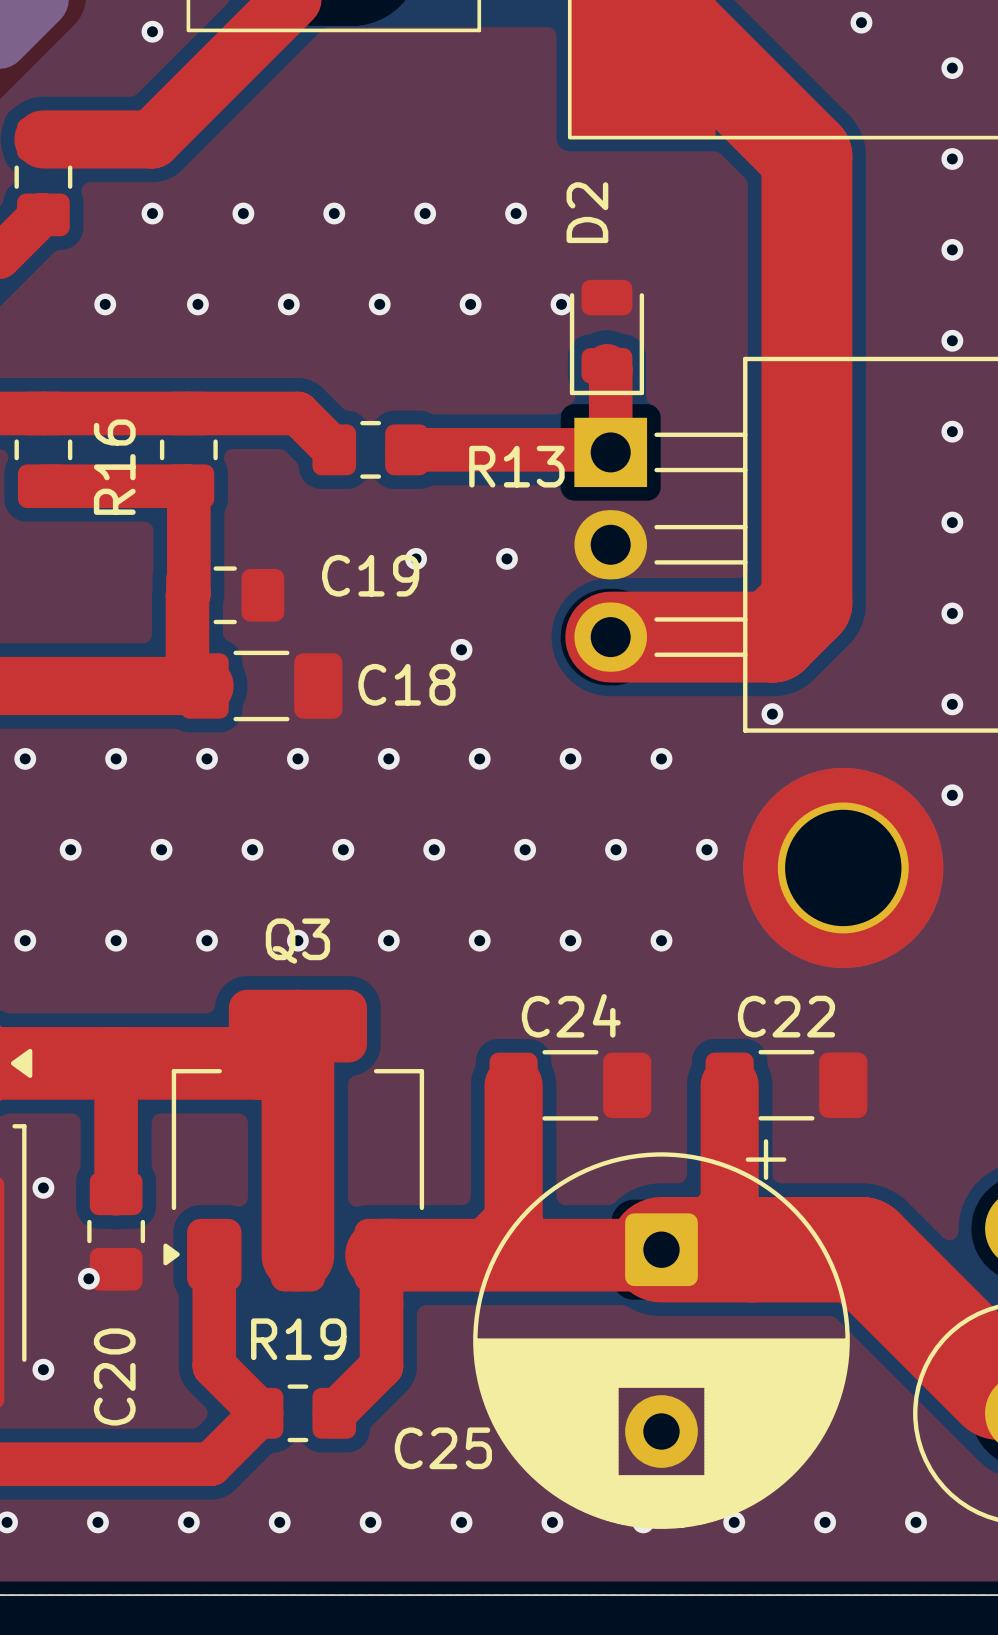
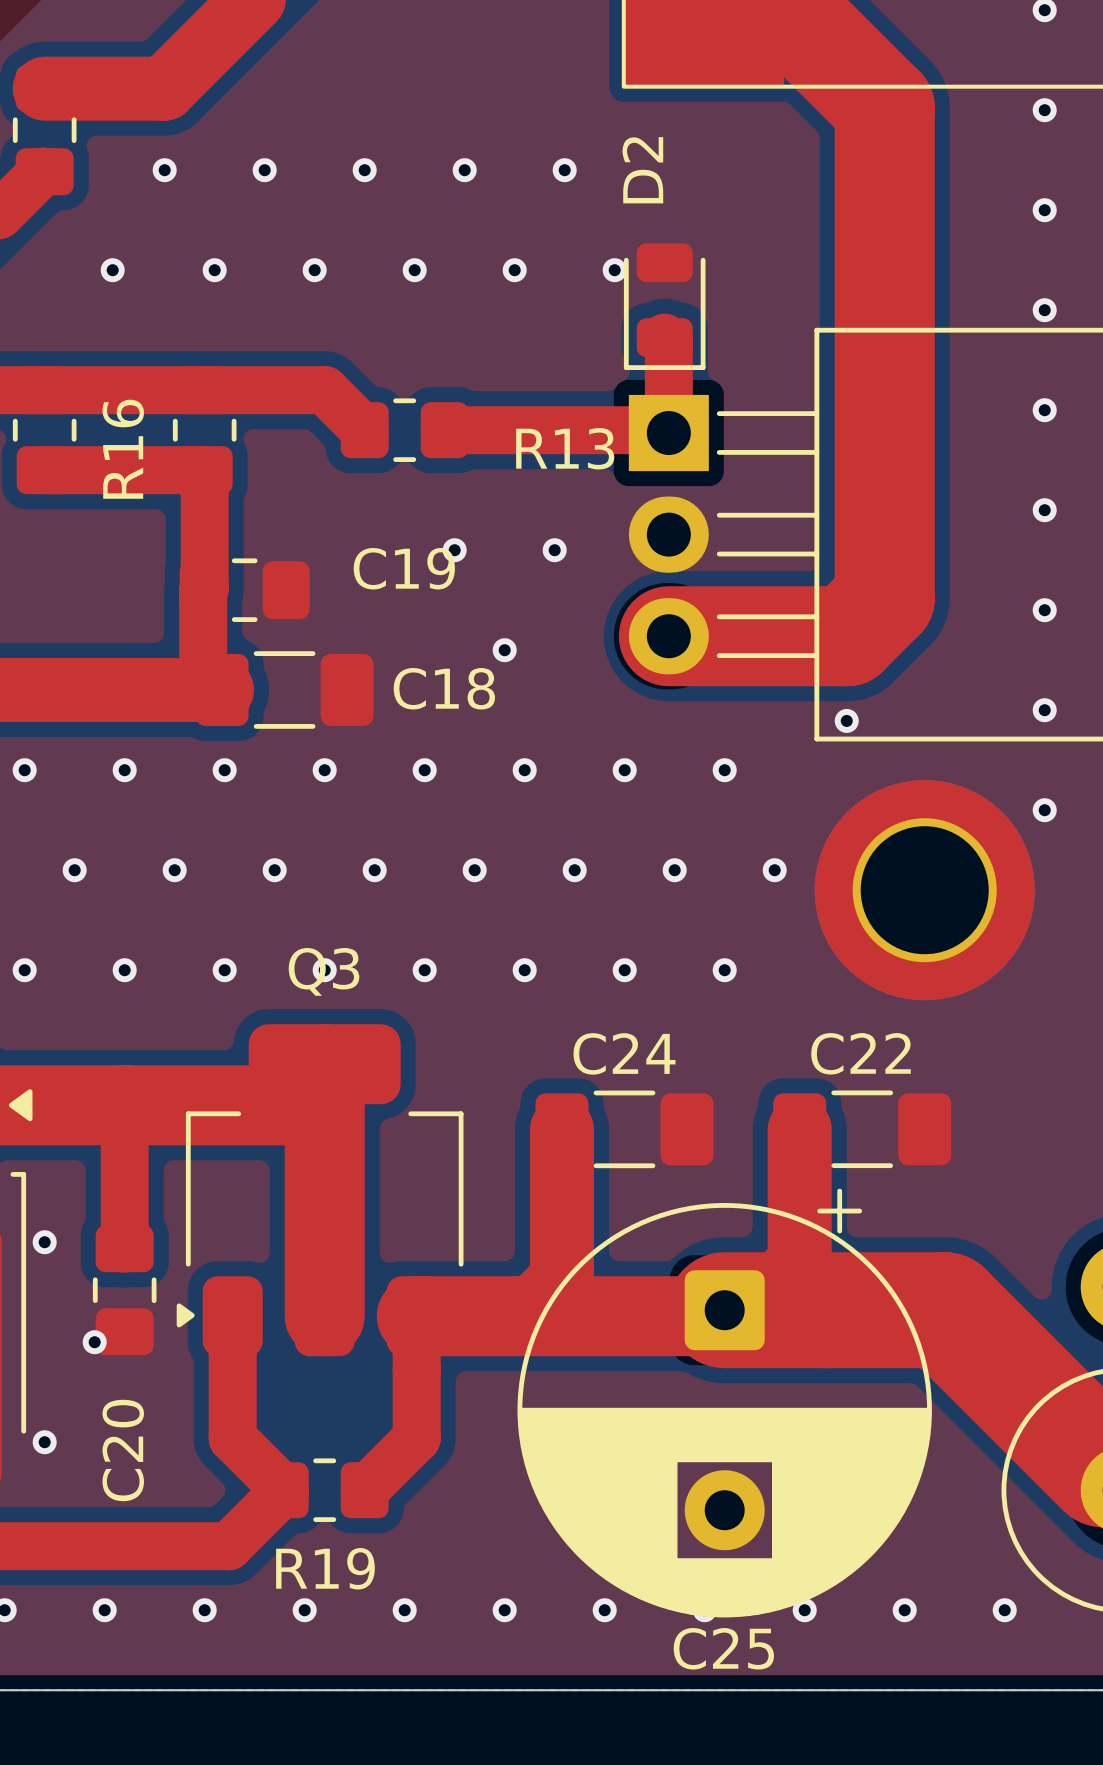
R19 name position: R19 (298, 1339) -> R19 (325, 1568)
C25 name position: C25 (443, 1448) -> C25 (723, 1648)

